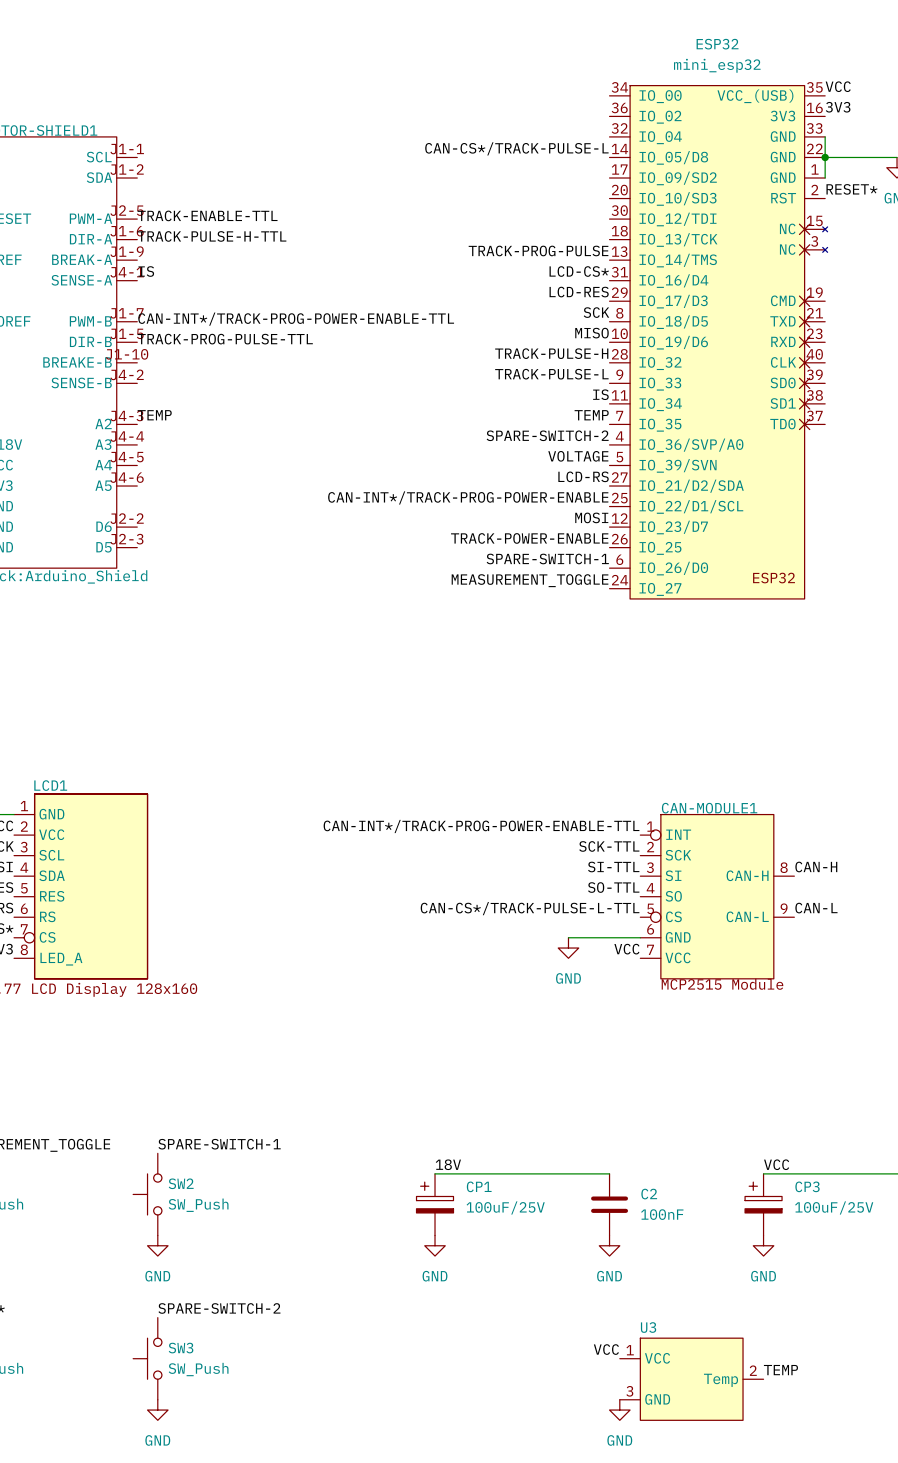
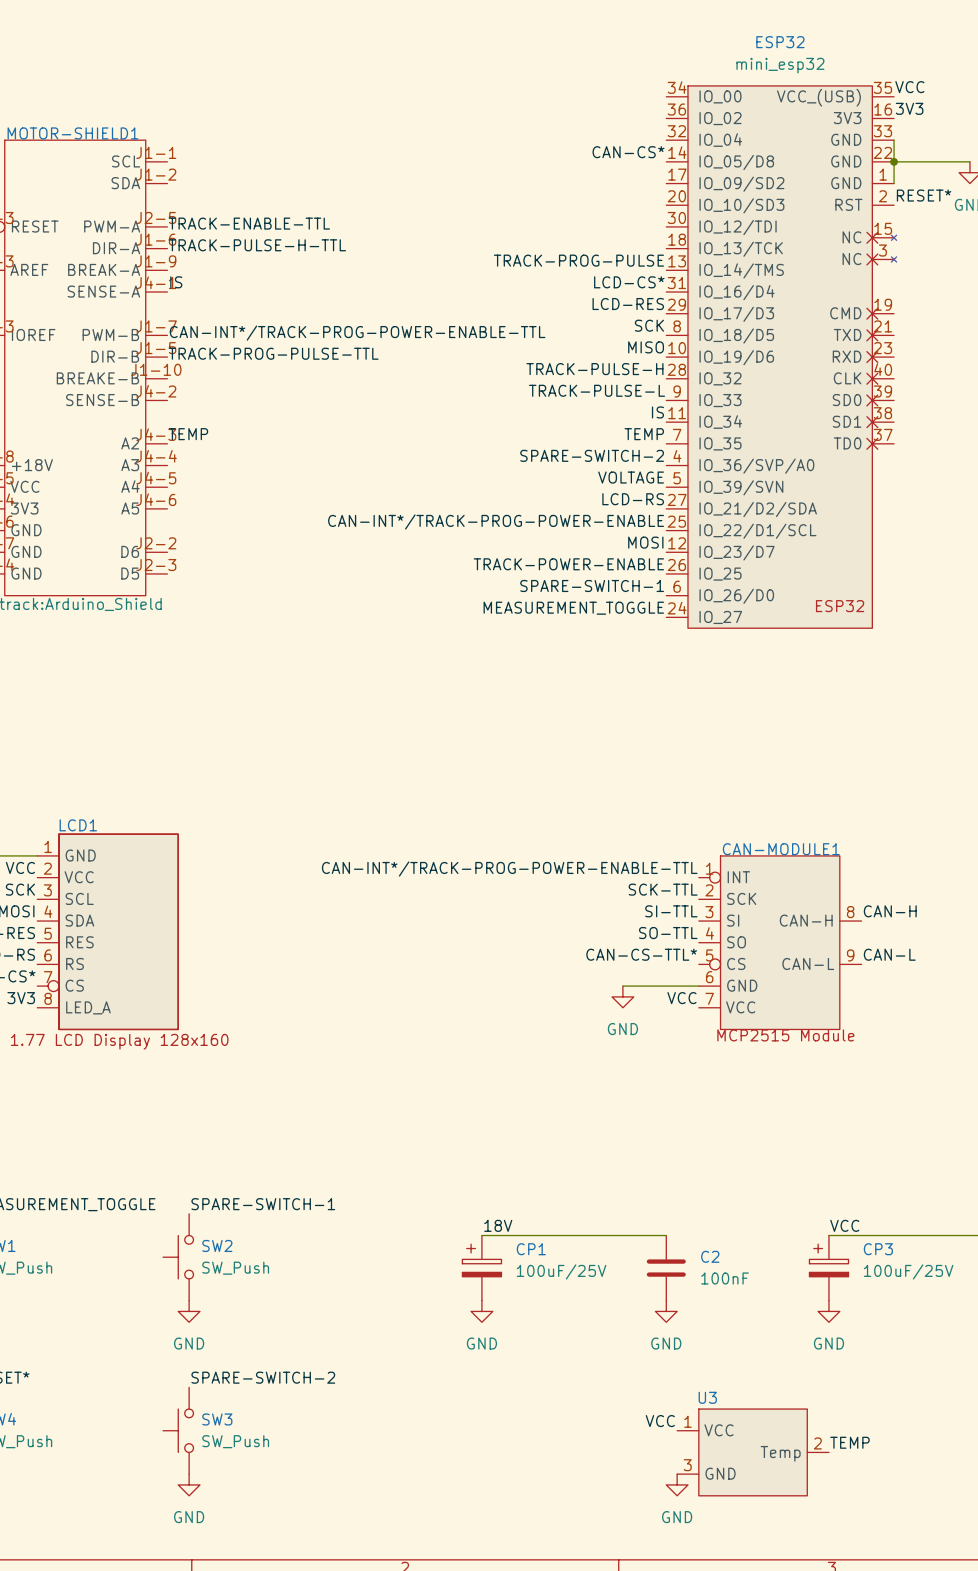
label: CAN-CS*/TRACK-PULSE-L (516, 148) -> CAN-CS* (628, 152)
label: CAN-CS*/TRACK-PULSE-L-TTL (530, 908) -> CAN-CS-TTL* (641, 954)

